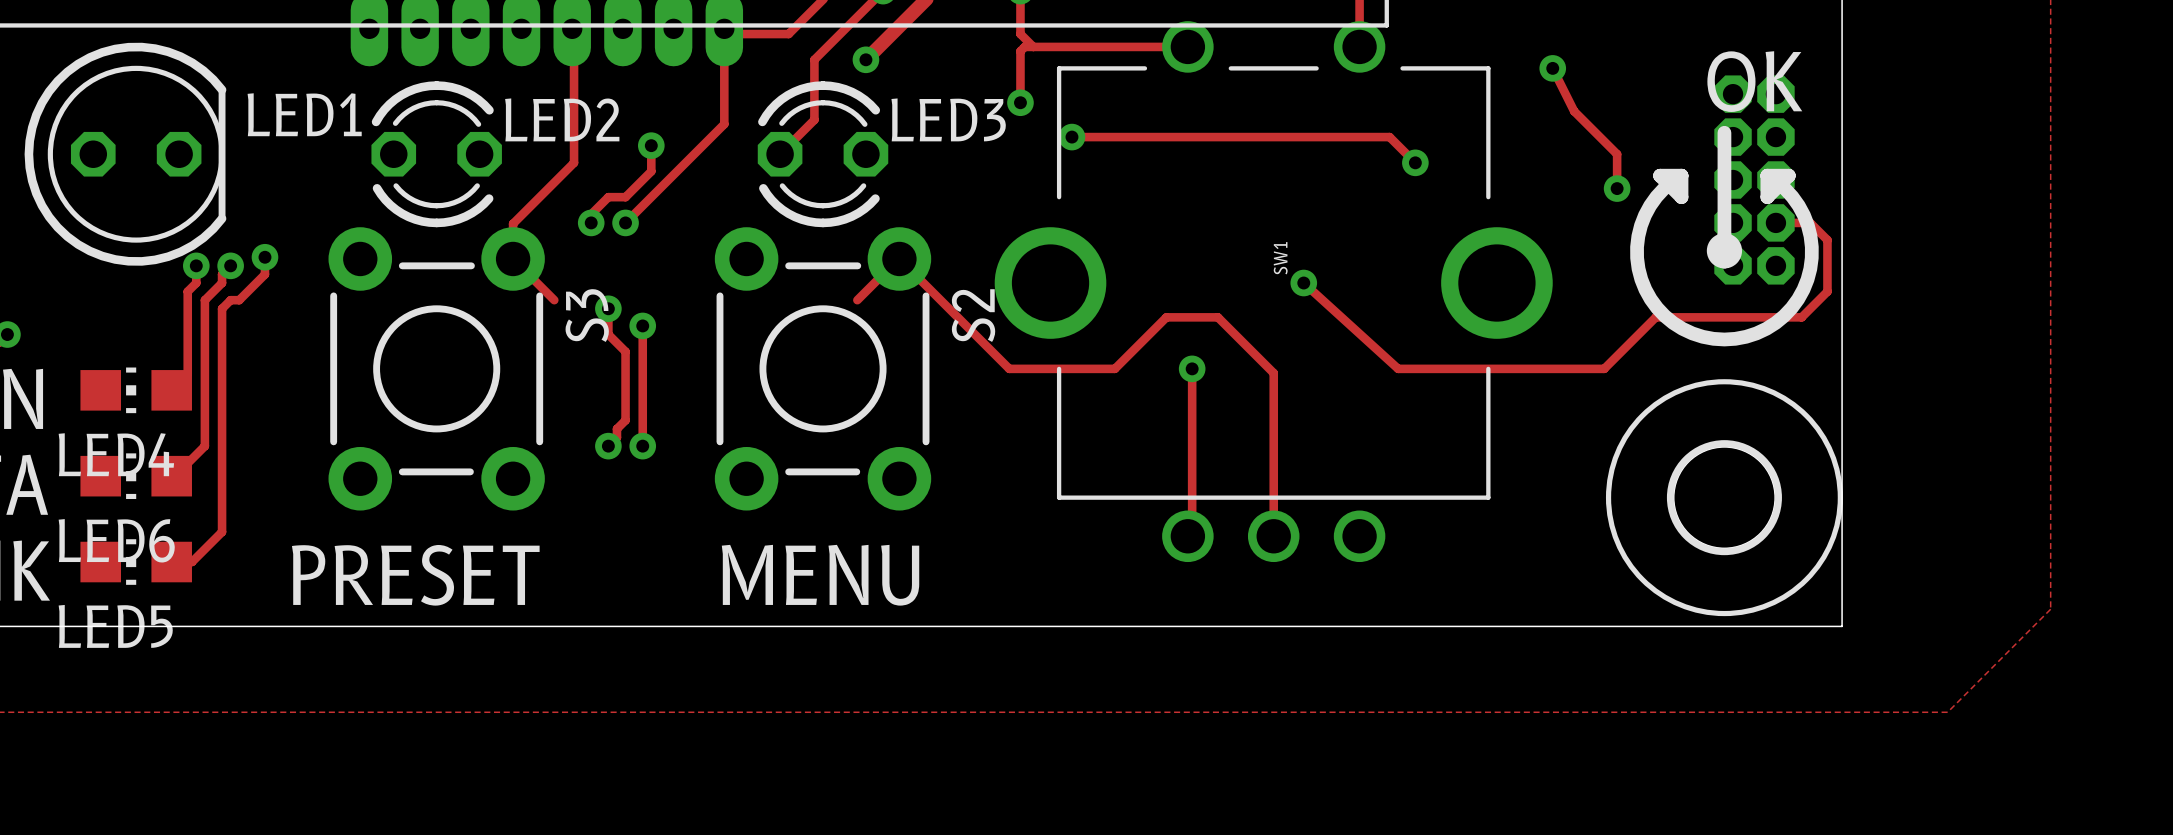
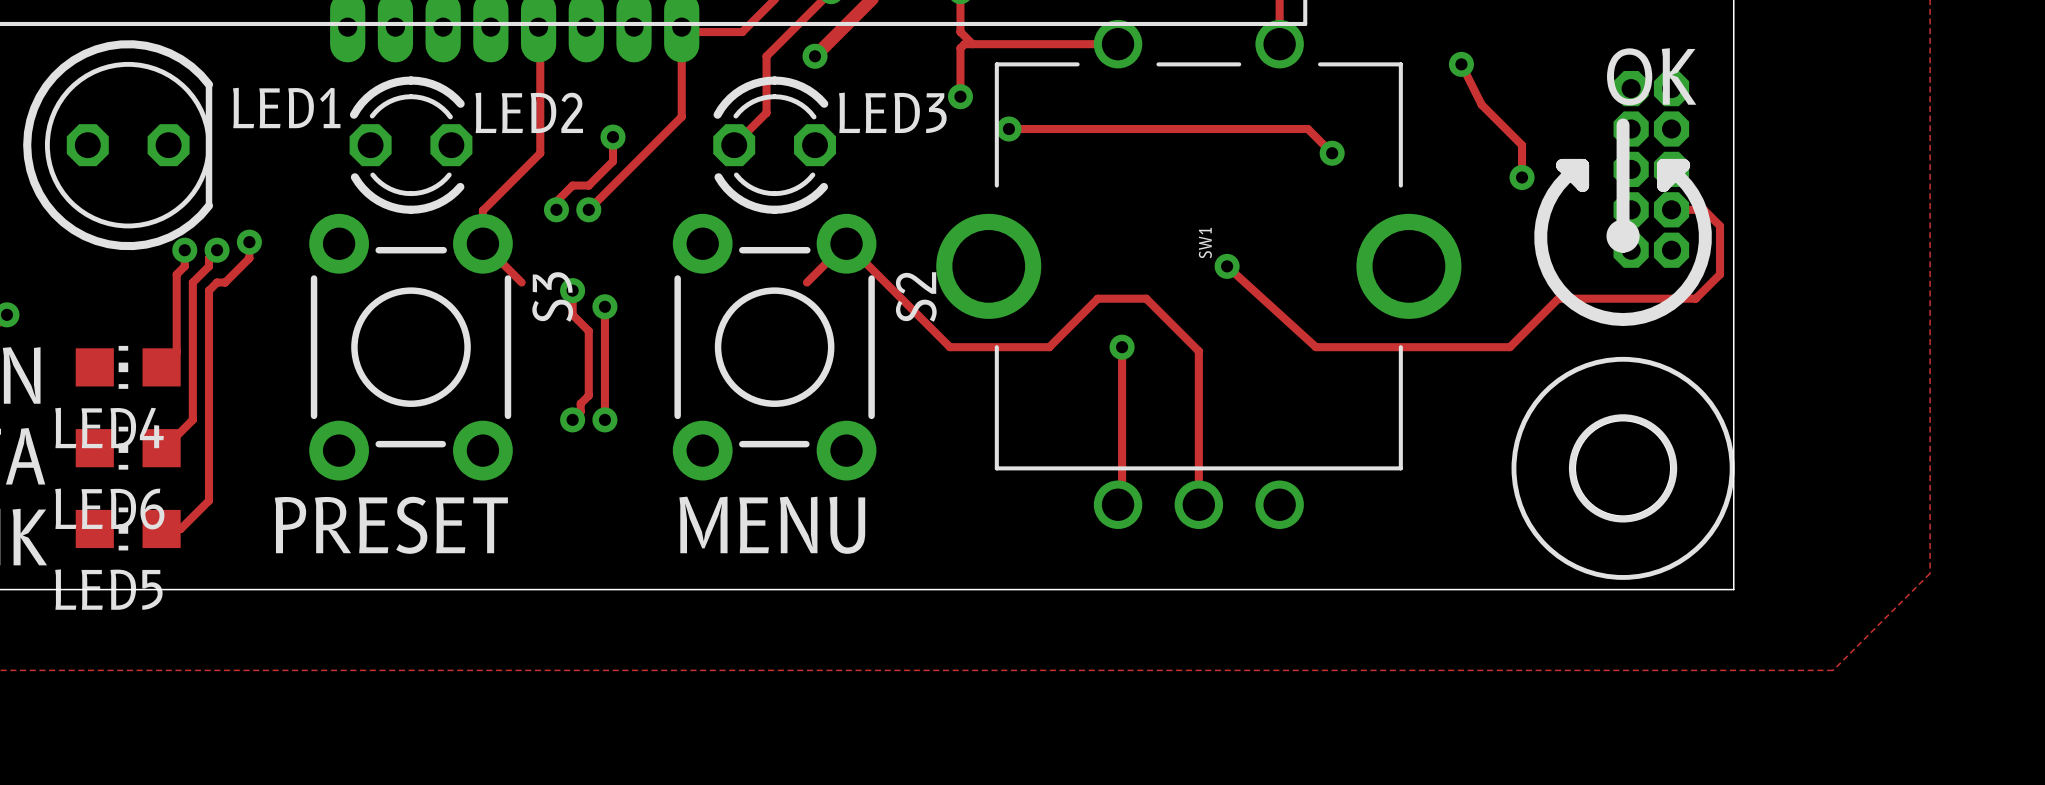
text position: PRESET (415, 575) -> PRESET (391, 525)
text position: MENU (820, 575) -> MENU (772, 525)

